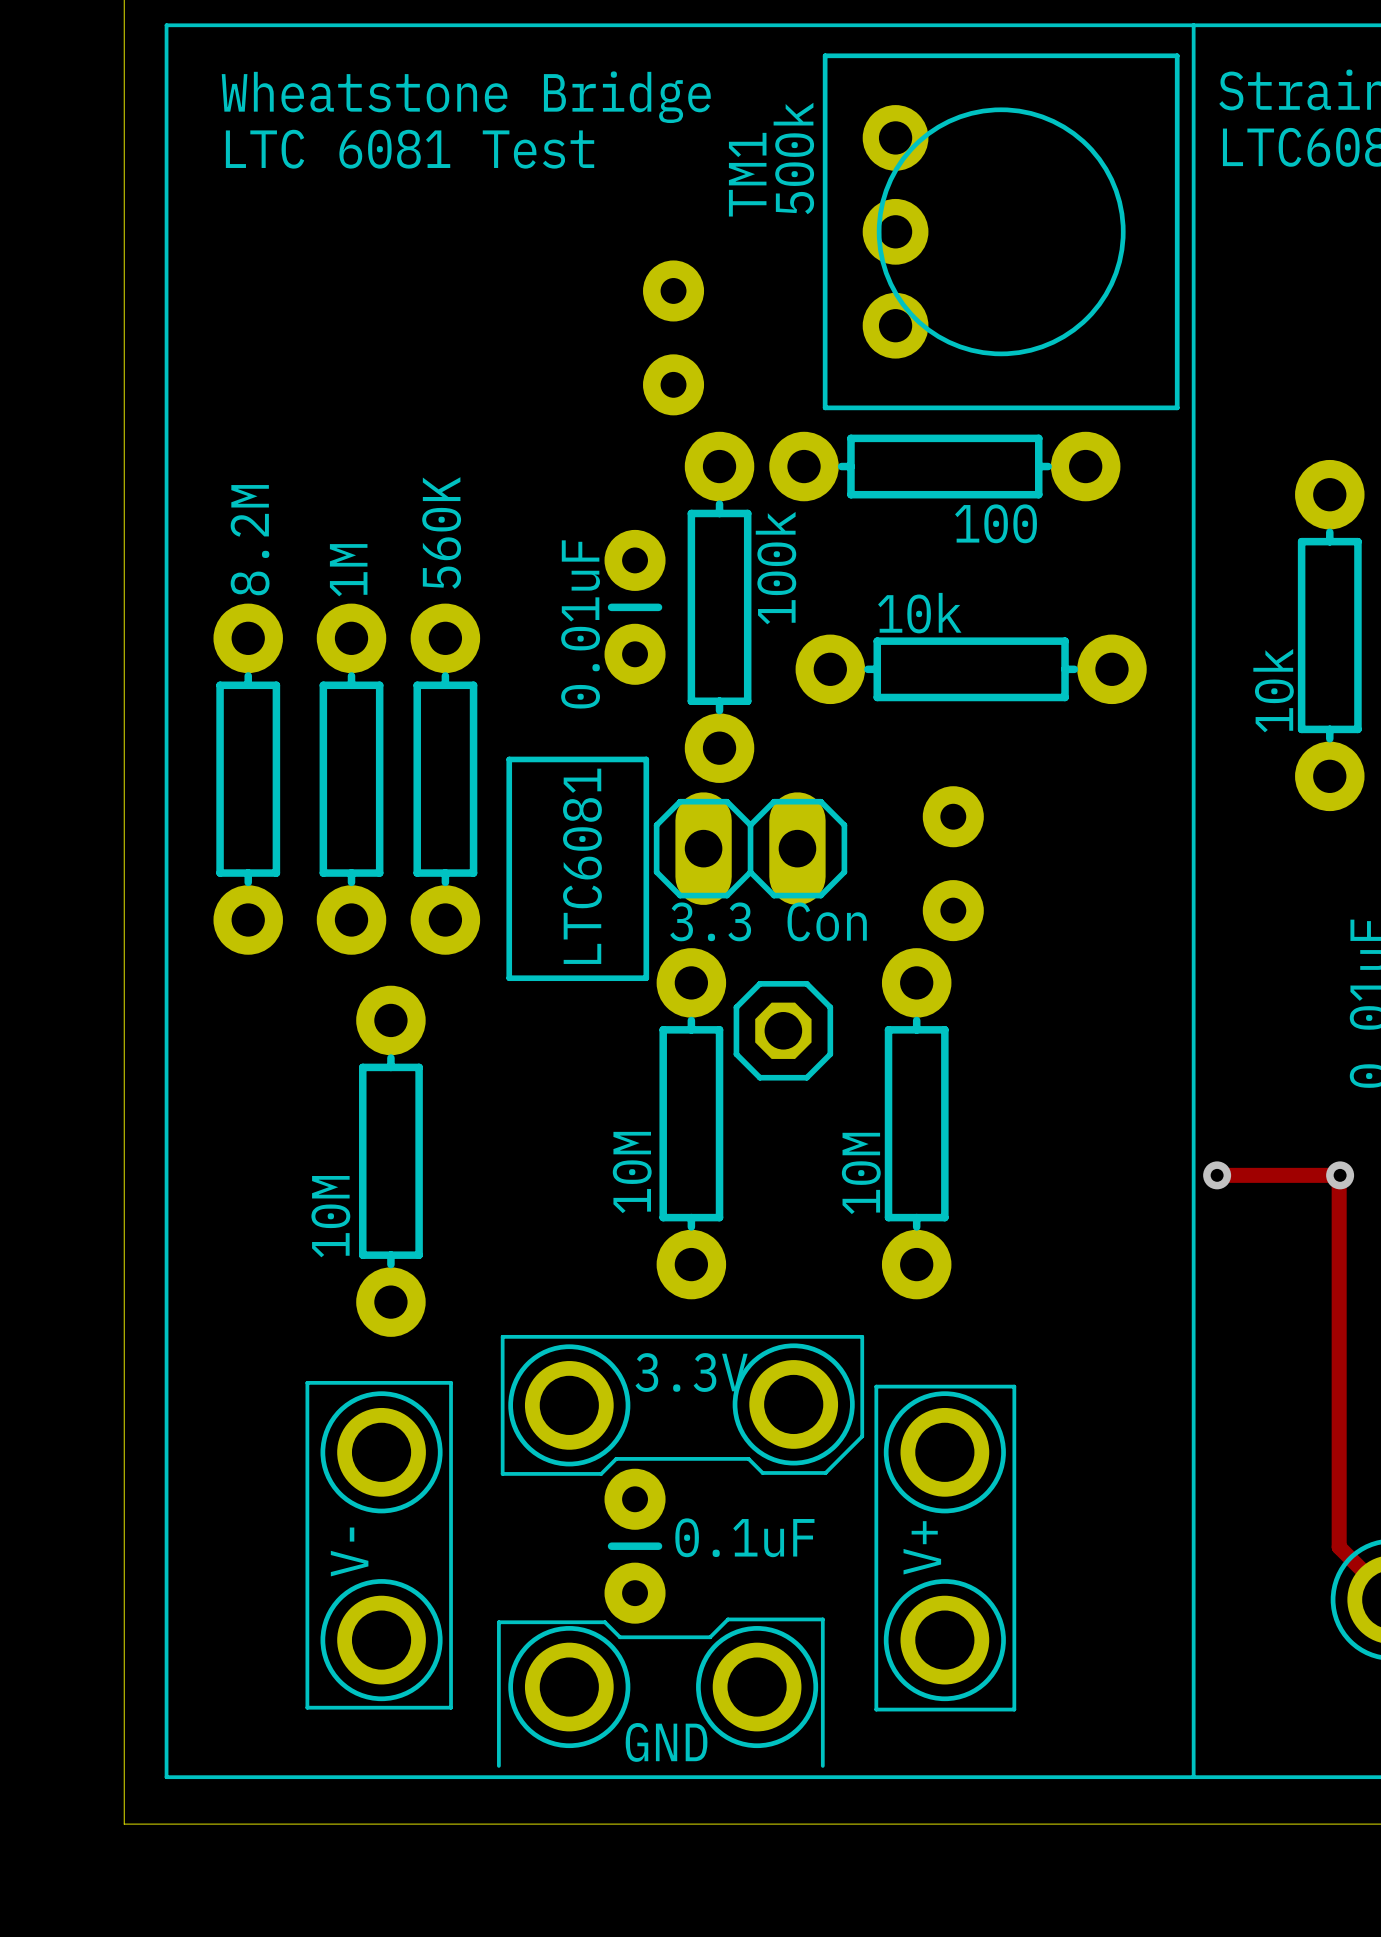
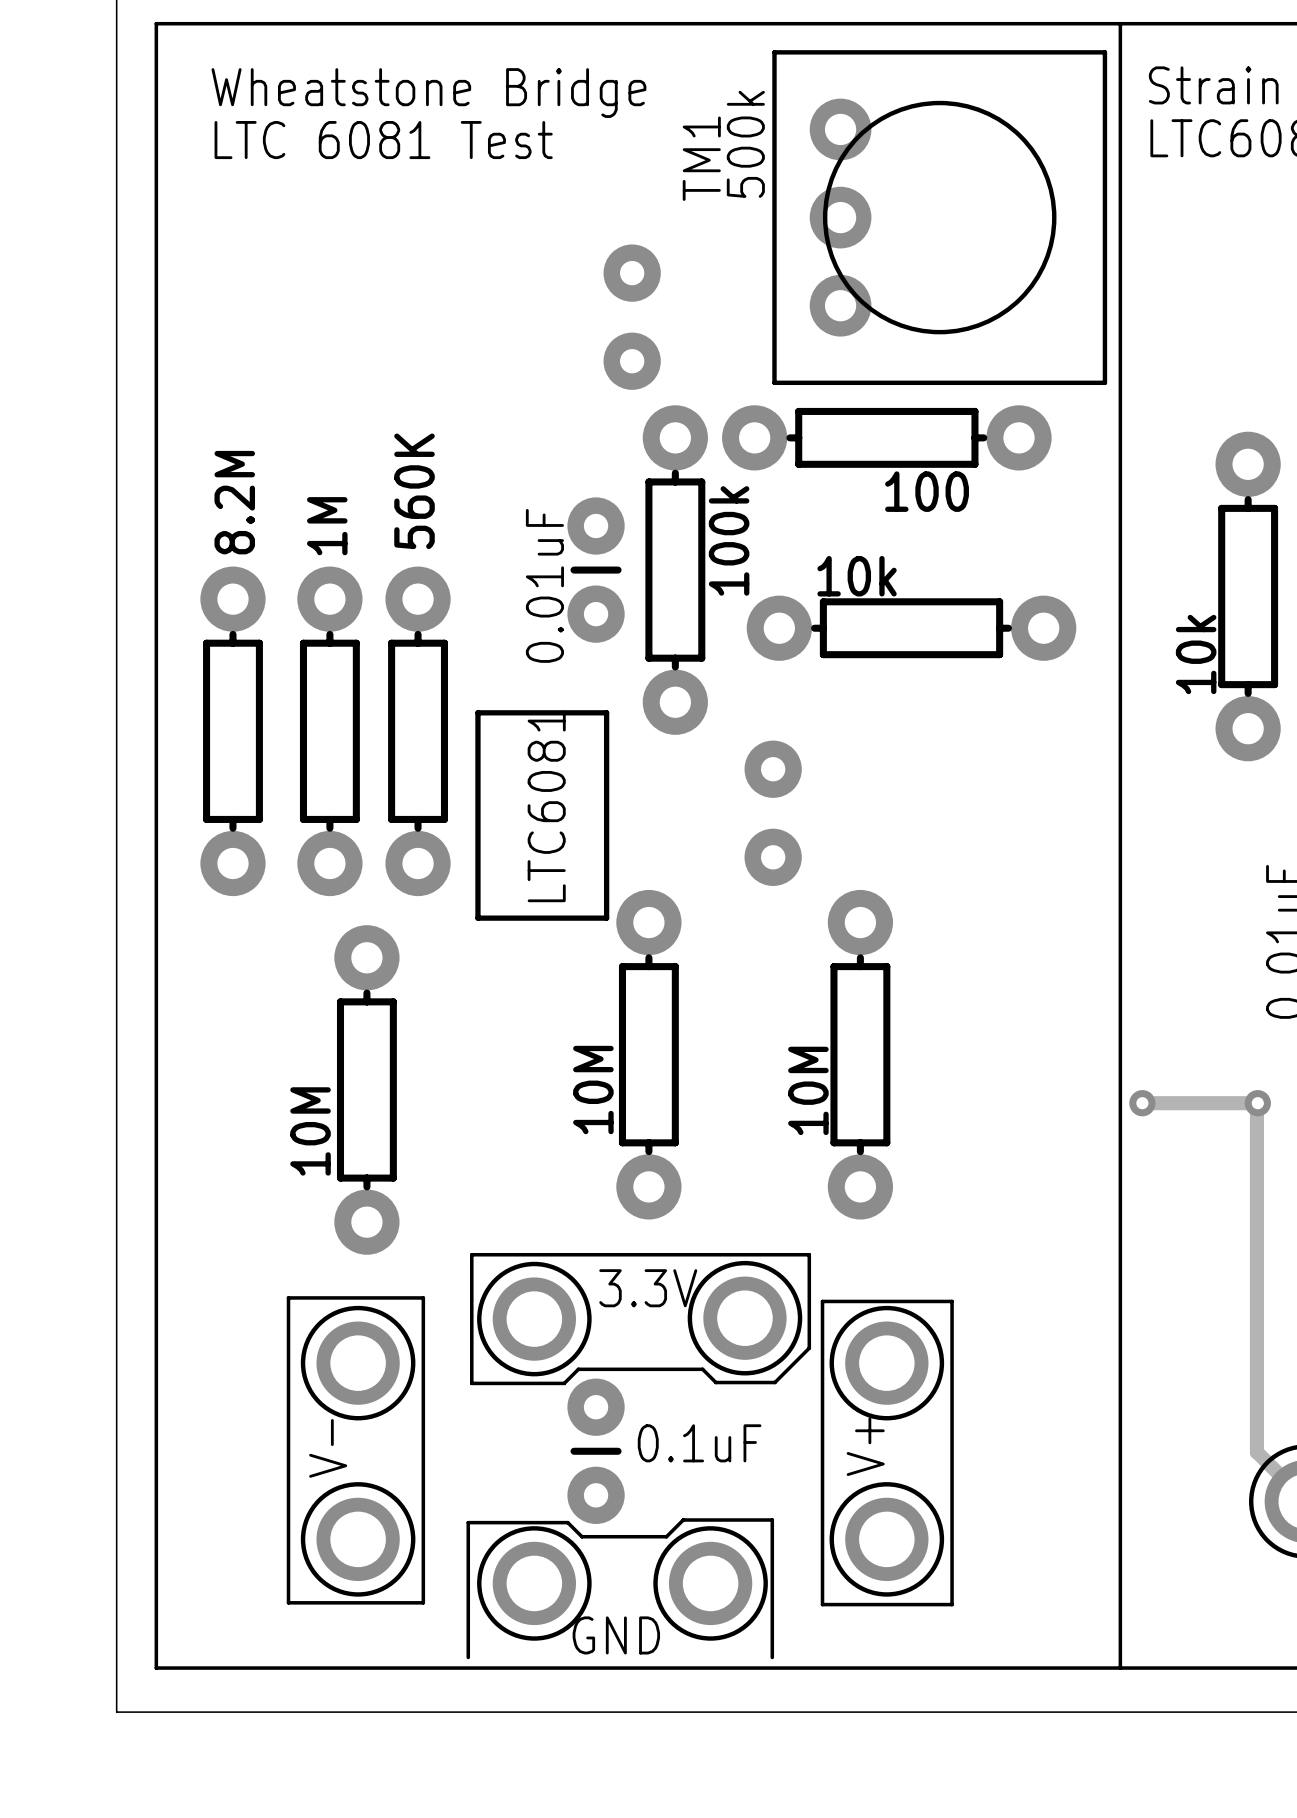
part: (750, 848) -> none
part position: (953, 863) -> (773, 813)
text: 3.3 Con (768, 921) -> none
part: (783, 1030) -> none

